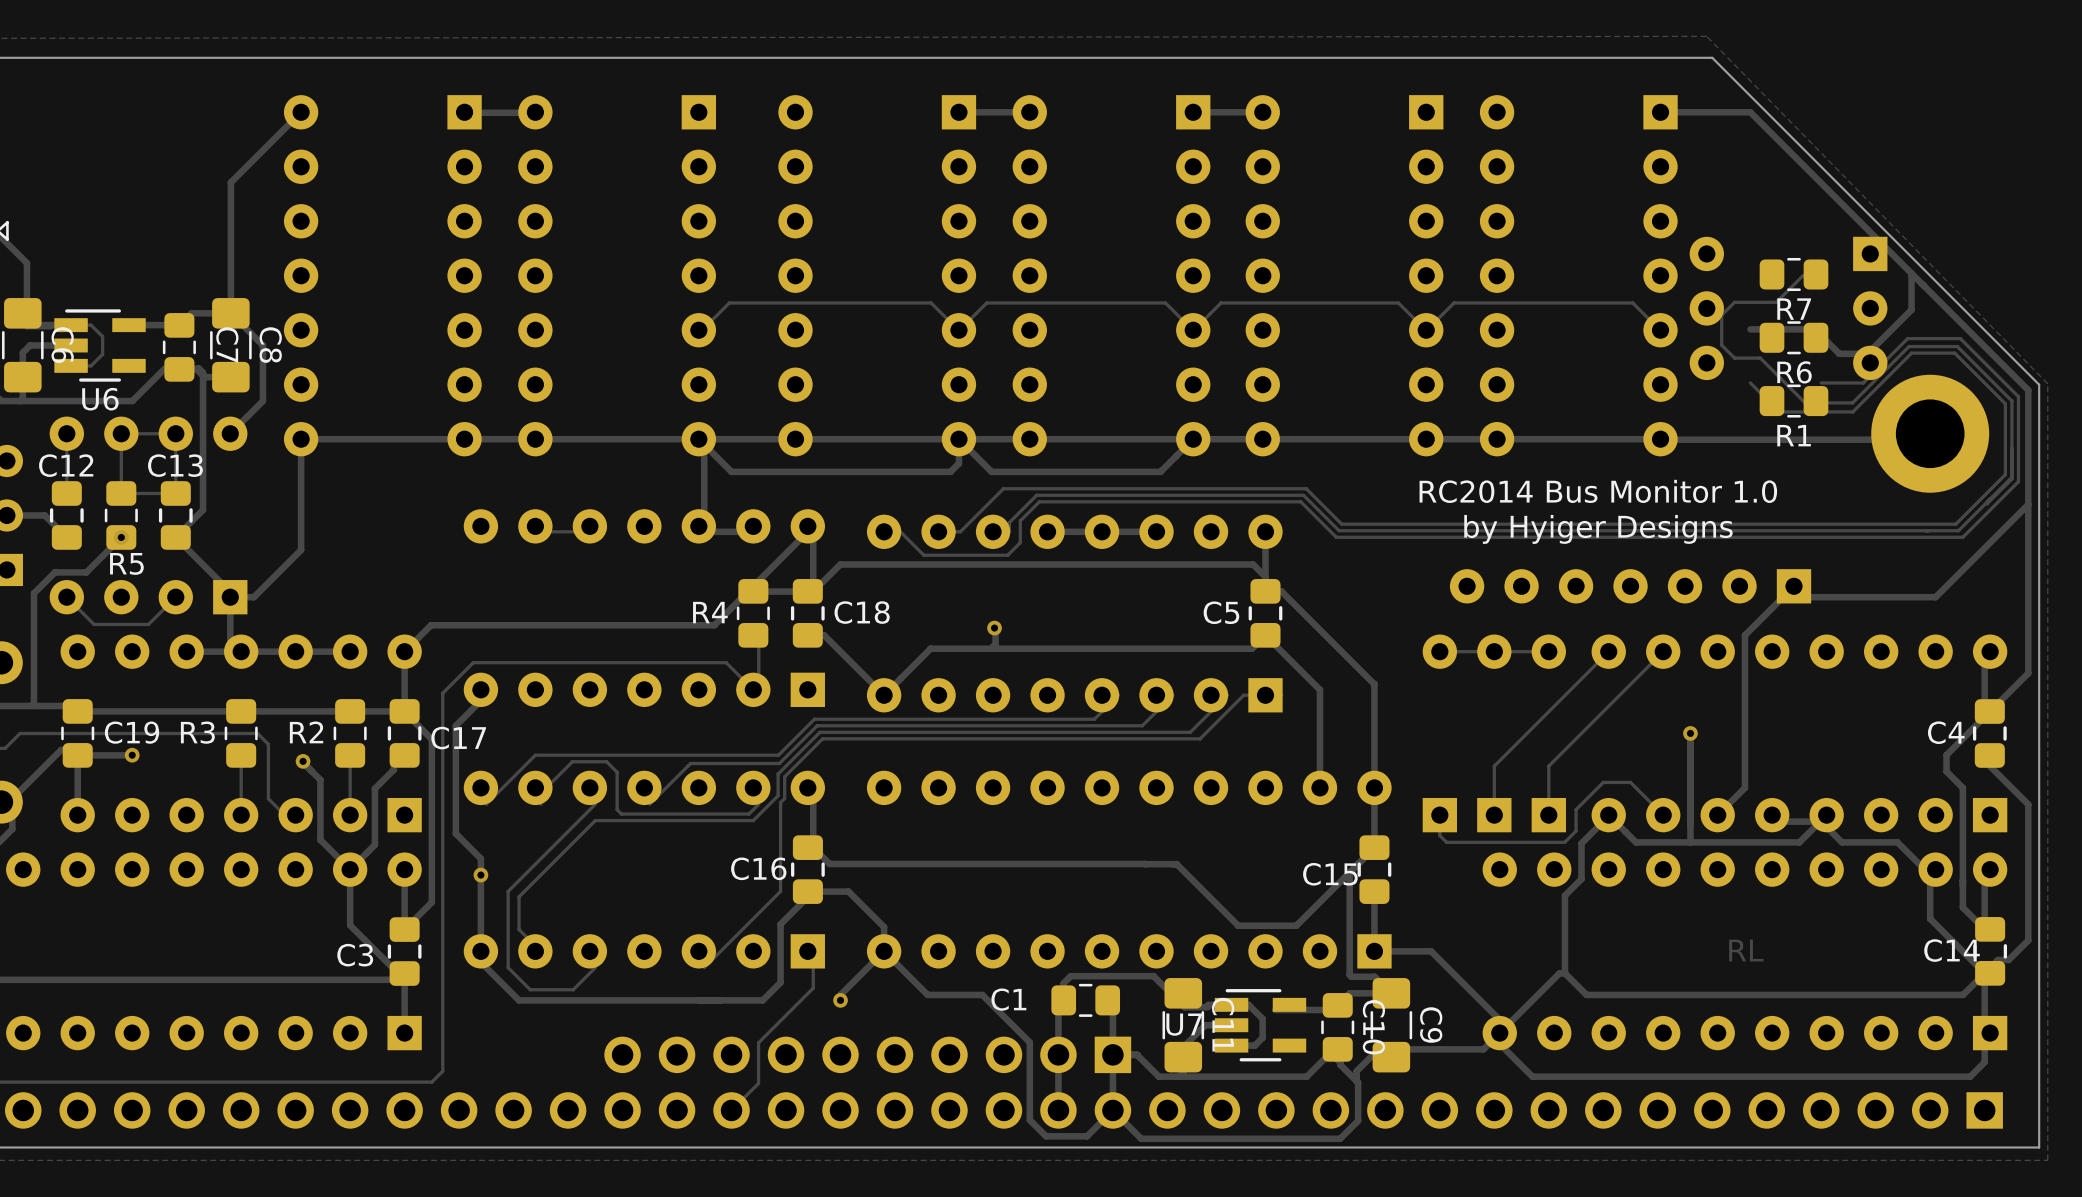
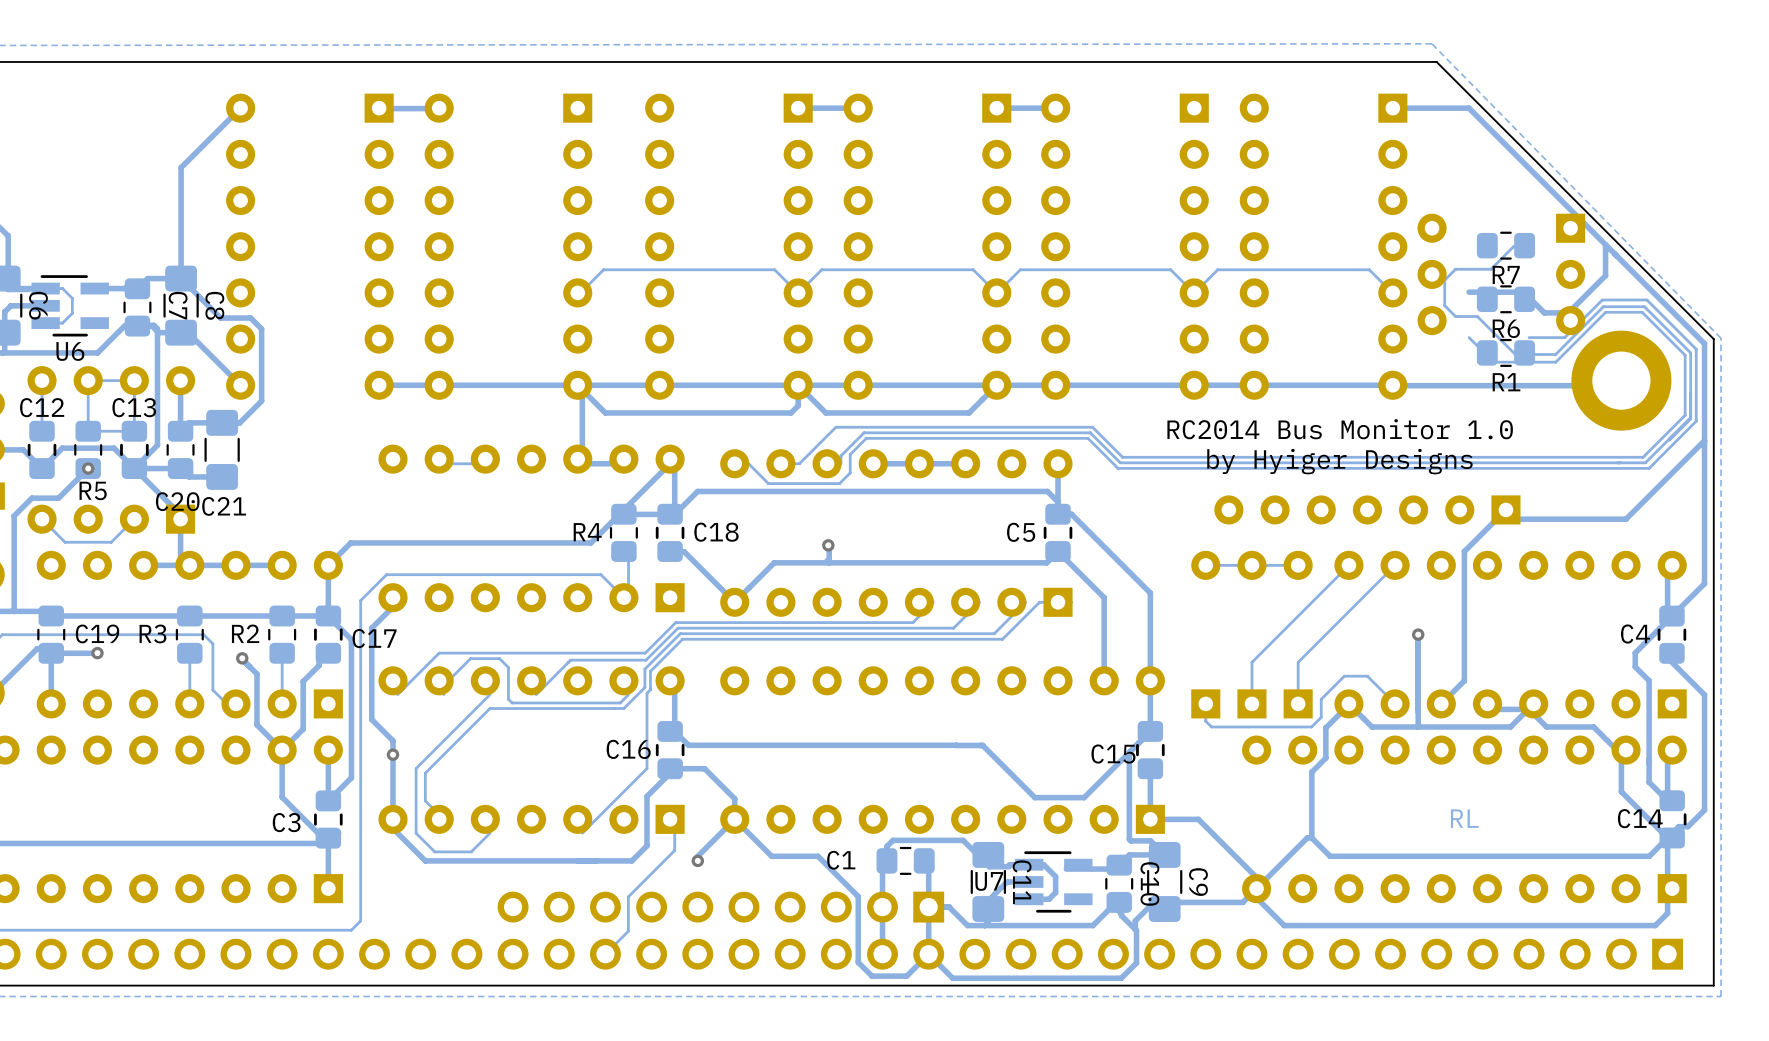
track: (262, 345) (262, 401) (230, 433) -> (208, 305) (220, 318) (250, 318) (261, 328) (261, 401) (239, 422) (188, 422) (180, 431) (180, 380)
track: none -> (181, 332) (188, 332) (240, 385)
track: (464, 439) (301, 439) (301, 550) (253, 597) (230, 597) -> none
C20: none -> (180, 449)
C21: none -> (222, 449)
track: none -> (42, 468) (62, 448) (114, 448) (134, 468) (180, 468) (188, 476) (222, 476)

